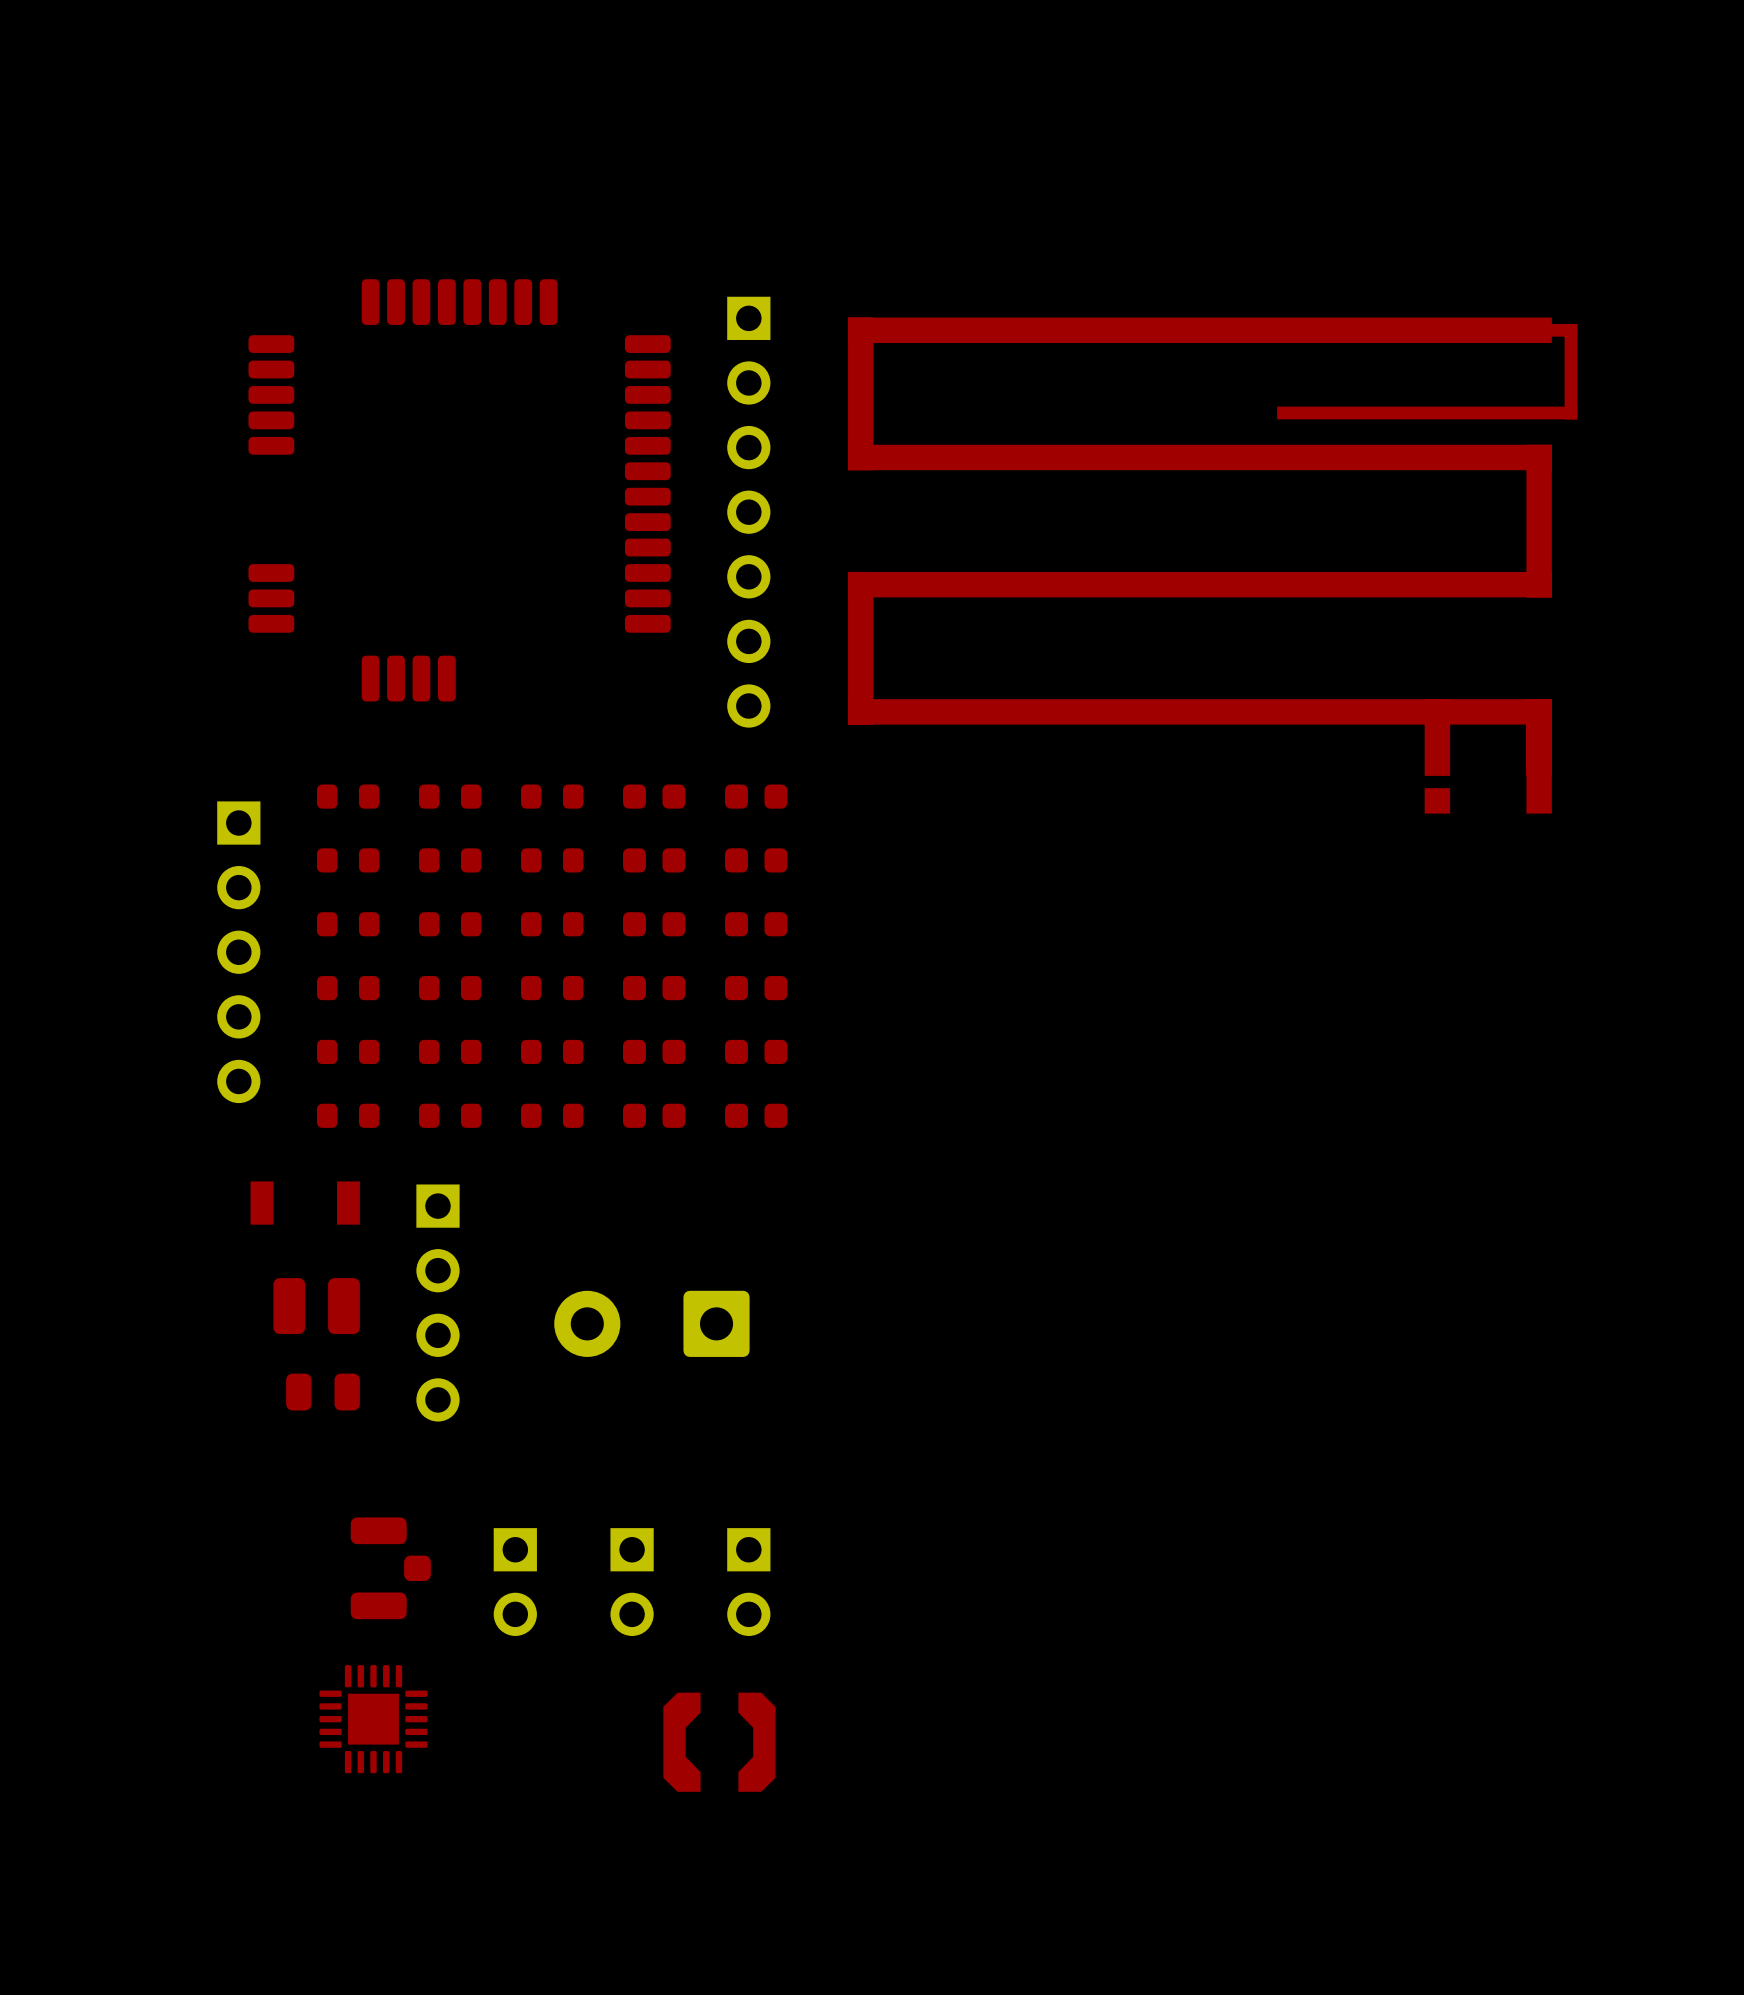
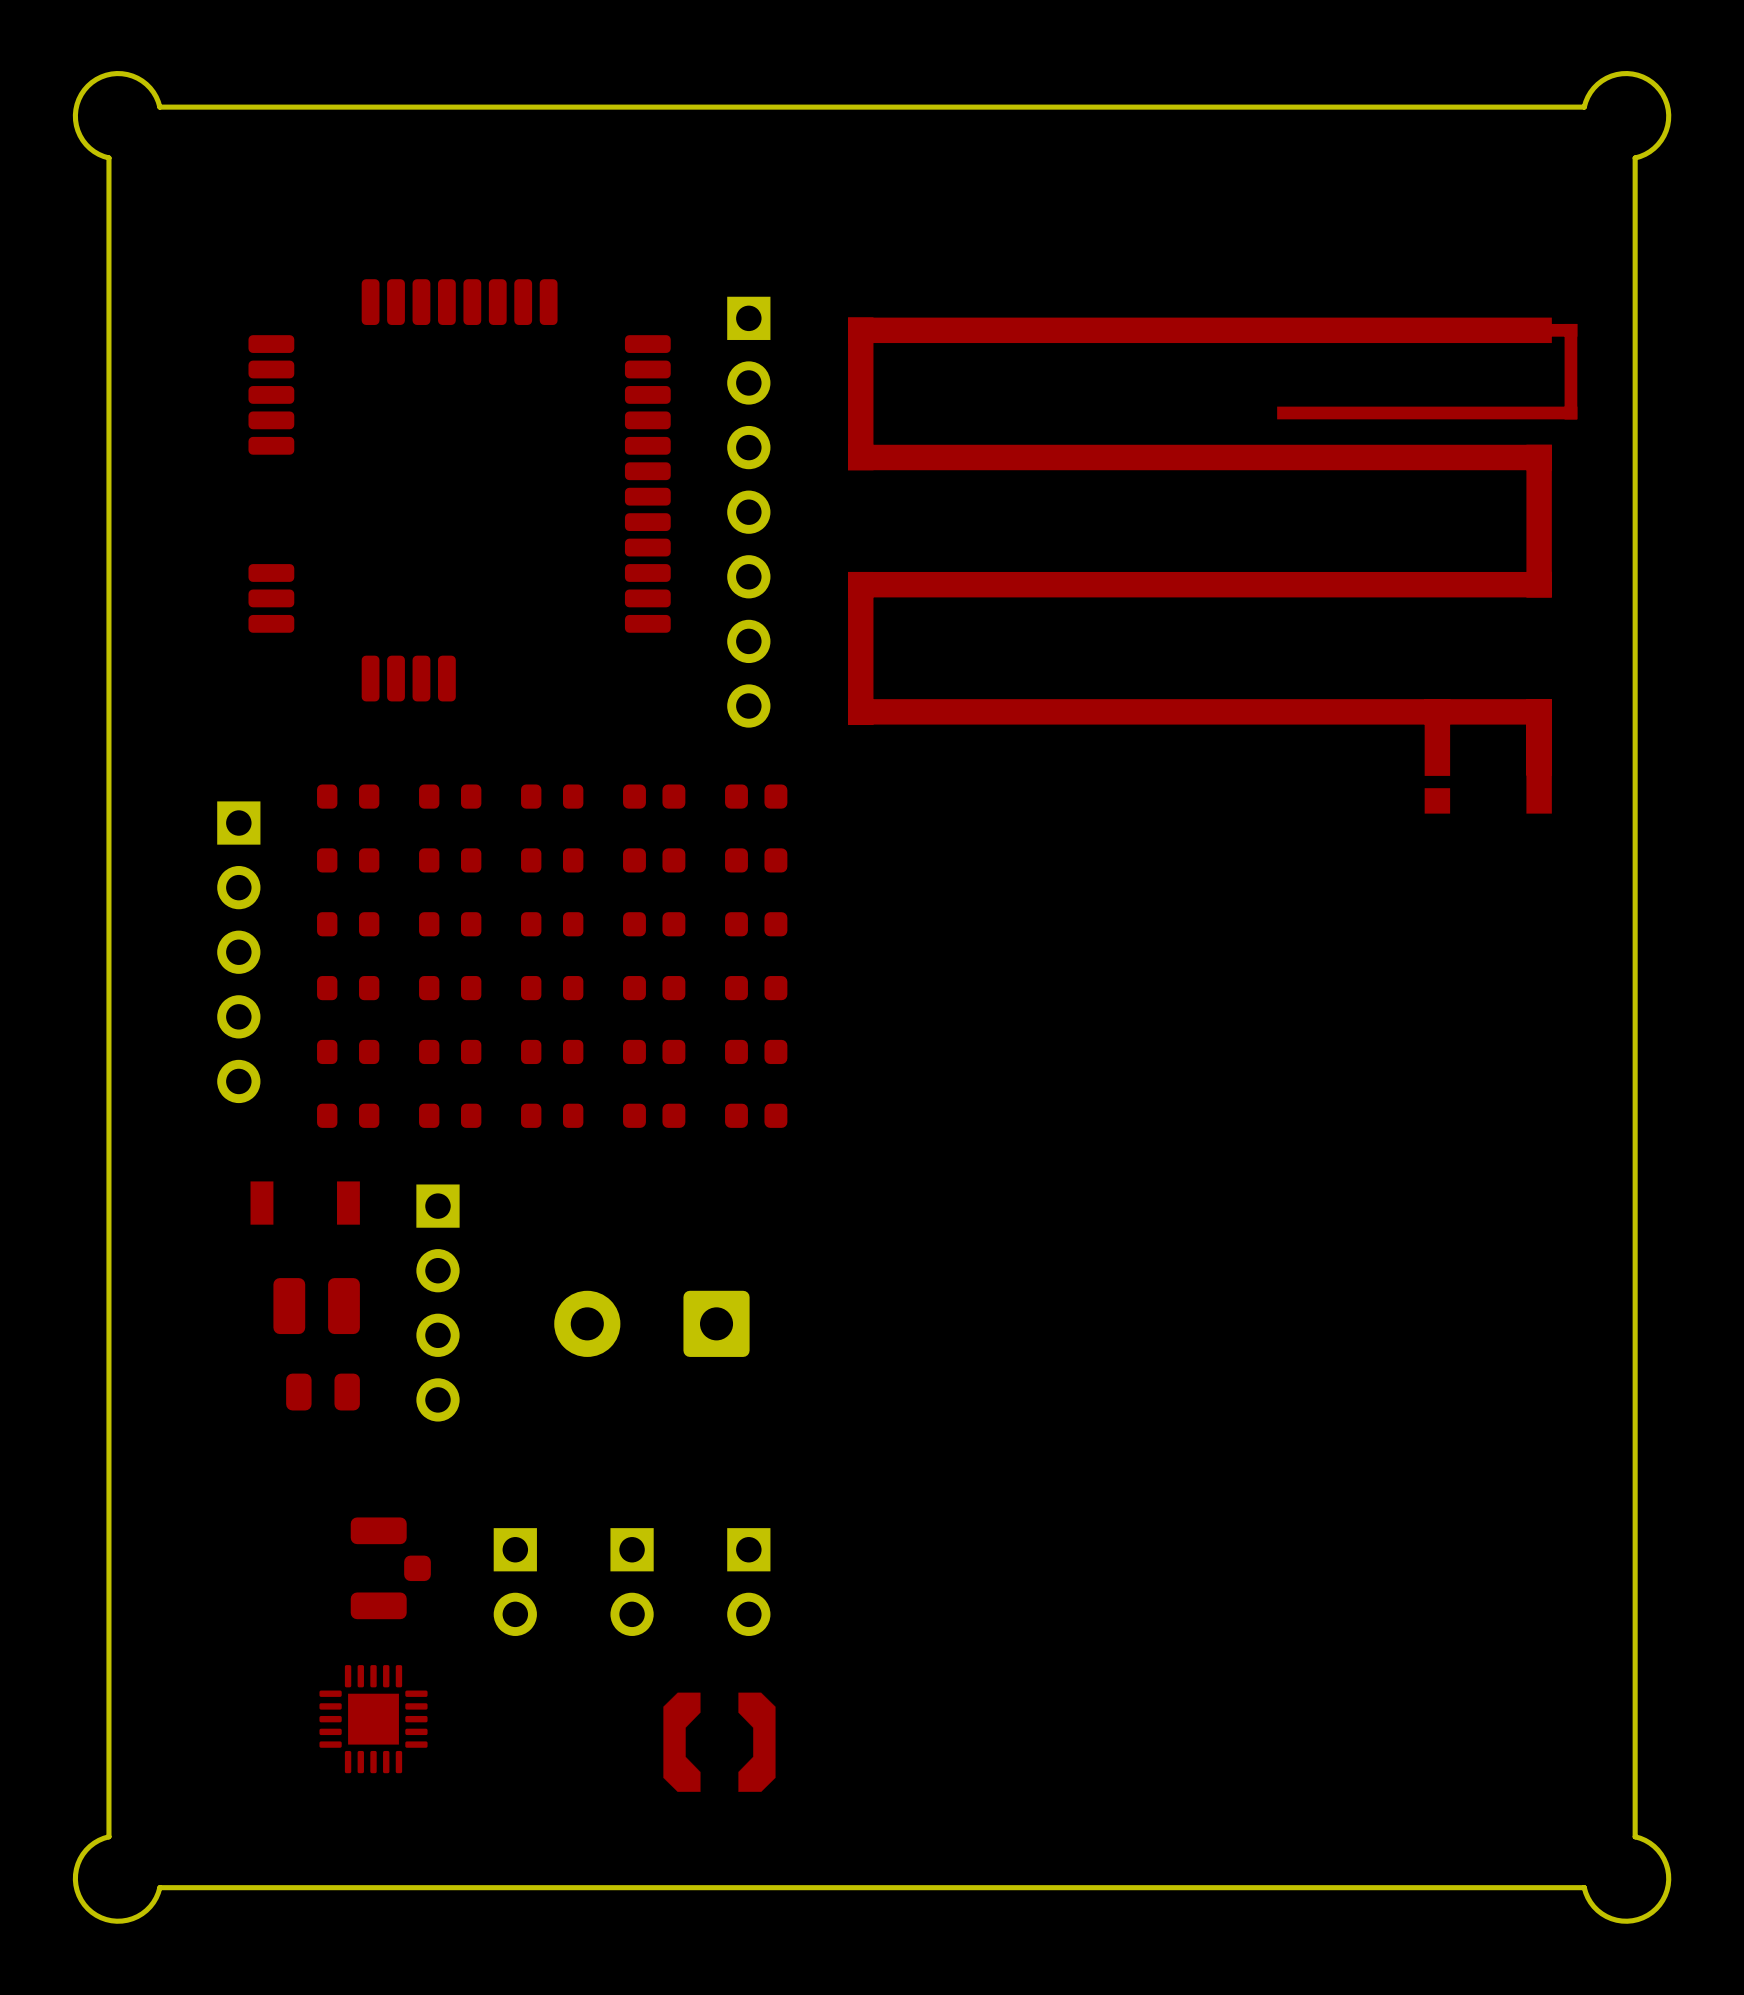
board edge: none -> (1584, 107) (159, 107) (153, 92) (142, 80) (127, 74) (116, 73) (101, 77) (84, 90) (75, 109) (77, 130) (89, 148) (108, 157) (108, 1836) (98, 1840) (86, 1850) (77, 1863) (75, 1879) (81, 1900) (91, 1912) (111, 1920) (132, 1918) (150, 1906) (159, 1887) (1584, 1887) (1587, 1897) (1597, 1910) (1611, 1918) (1627, 1921) (1647, 1915) (1659, 1904) (1668, 1885) (1666, 1863) (1654, 1846) (1635, 1836) (1635, 157) (1649, 151) (1661, 140) (1666, 130) (1668, 114) (1665, 99) (1656, 86) (1642, 77) (1627, 73) (1611, 76) (1597, 84) (1590, 92) (1584, 107)

